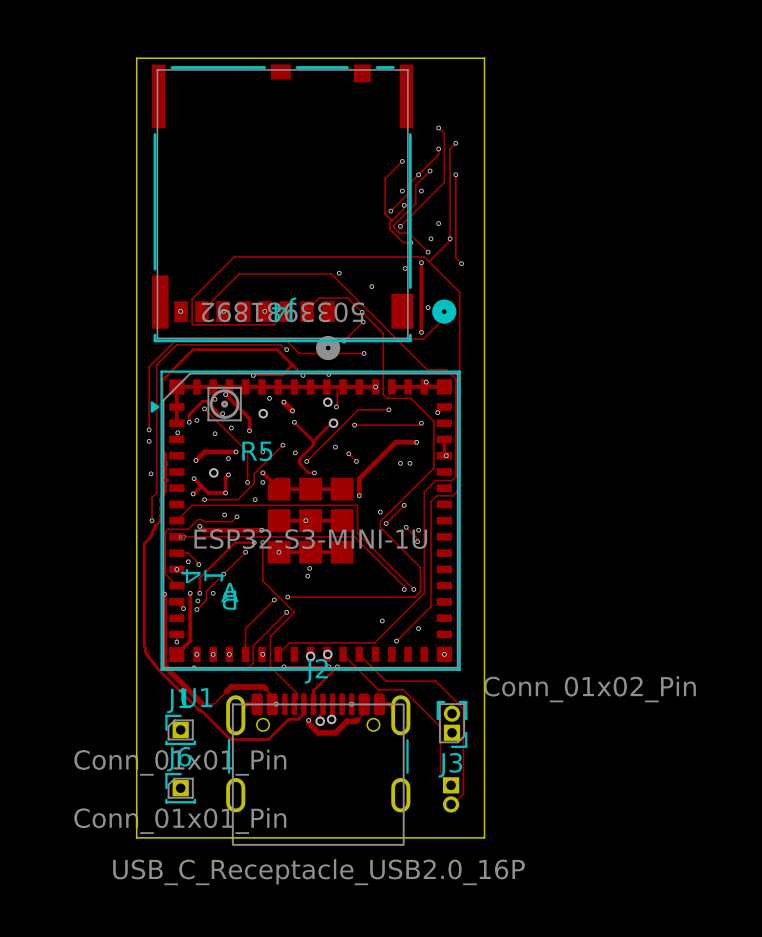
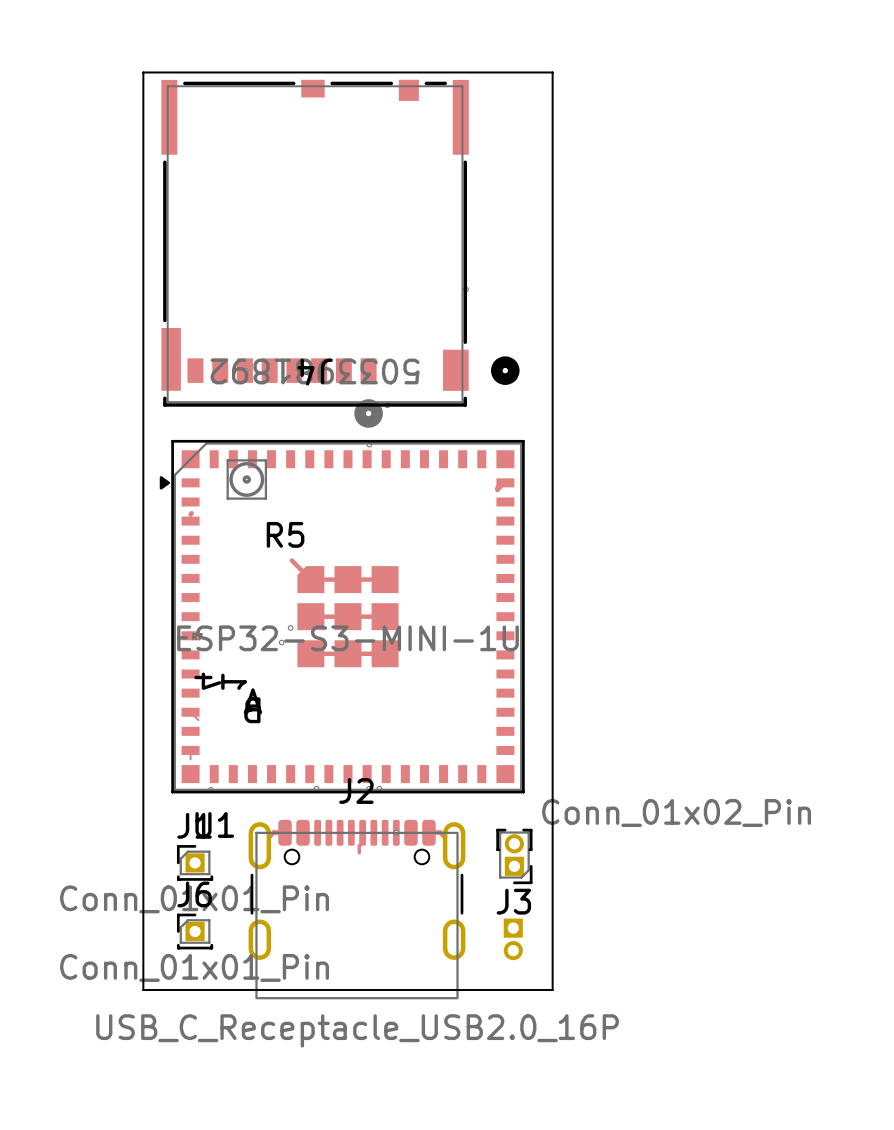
track: (438, 127) (444, 133) (444, 182) (400, 226) -> none
via: (438, 127) -> none
track: (455, 143) (450, 149) (450, 240) (429, 261) -> none
via: (455, 143) -> none
track: (438, 149) (438, 154) (408, 185) (408, 193) (390, 211) -> none
via: (438, 149) -> none
track: (402, 161) (385, 178) (385, 213) (391, 220) -> none
via: (402, 161) -> none
track: (430, 170) (415, 185) (415, 203) (393, 225) (399, 233) (409, 233) (428, 252) -> none
via: (430, 170) -> none
via: (418, 174) -> none
track: (455, 174) (455, 257) (461, 263) -> none
via: (455, 174) -> none
via: (402, 191) -> none
via: (421, 191) -> none
track: (404, 205) (404, 208) (389, 222) (389, 229) (403, 242) (410, 242) -> none
via: (404, 205) -> none
via: (390, 211) -> none
via: (438, 223) -> none
via: (400, 226) -> none
via: (431, 238) -> none
via: (450, 238) -> none
via: (428, 252) -> none
track: (421, 262) (421, 332) -> none
via: (421, 262) -> none
via: (461, 263) -> none
via: (405, 268) -> none
via: (339, 273) -> none
via: (371, 286) -> none
via: (428, 307) -> none
track: (451, 307) (451, 311) (423, 339) (396, 339) -> none
via: (180, 311) -> none
track: (201, 311) (238, 274) (331, 274) (427, 369) (446, 369) (455, 379) (455, 476) (452, 480) (435, 480) (424, 492) (424, 593) (374, 642) (289, 642) (278, 654) -> none
via: (264, 311) -> none
track: (285, 311) (274, 324) (192, 323) (192, 299) (234, 256) (424, 256) (459, 292) (459, 489) (452, 495) (436, 495) (431, 501) (431, 606) (396, 641) -> none
track: (306, 311) (319, 298) (347, 298) (383, 333) (383, 394) (387, 398) (410, 398) (433, 421) (433, 468) (380, 521) (380, 527) (420, 567) (420, 591) (414, 597) (287, 597) -> none
via: (362, 312) -> none
track: (363, 321) (344, 341) -> none
via: (363, 321) -> none
via: (421, 332) -> none
track: (285, 349) (281, 344) (176, 344) (156, 364) (156, 492) (152, 497) (152, 520) -> none
via: (286, 349) -> none
track: (364, 353) (299, 353) (284, 339) (176, 339) (149, 366) (149, 429) -> none
via: (364, 353) -> none
track: (292, 364) (282, 374) (253, 375) -> none
via: (253, 375) -> none
track: (302, 375) (277, 349) (193, 349) (162, 380) (162, 450) (165, 453) (164, 476) (167, 480) (164, 483) (164, 493) (160, 498) (160, 520) (154, 526) (151, 536) (144, 543) (144, 646) (147, 655) (157, 668) (231, 739) (268, 739) (288, 719) (298, 719) (303, 713) (303, 704) -> none
via: (302, 375) -> none
via: (426, 382) -> none
track: (337, 386) (336, 406) -> none
track: (375, 386) (176, 386) (176, 423) -> none
via: (375, 386) -> none
track: (391, 386) (424, 386) (426, 382) (431, 386) (444, 386) -> none
track: (225, 394) (249, 418) (249, 430) -> none
via: (225, 394) -> none
via: (269, 398) -> none
via: (215, 399) -> none
track: (283, 402) (292, 410) -> none
via: (283, 402) -> none
via: (327, 402) -> none
via: (336, 406) -> none
track: (204, 408) (247, 451) (247, 482) -> none
via: (204, 408) -> none
track: (388, 409) (358, 409) (306, 461) -> none
via: (388, 409) -> none
via: (292, 410) -> none
via: (437, 412) -> none
track: (222, 413) (218, 413) (206, 401) (202, 401) (189, 414) (189, 422) -> none
via: (222, 413) -> none
via: (263, 413) -> none
via: (196, 420) -> none
via: (189, 422) -> none
track: (294, 422) (313, 441) -> none
via: (294, 422) -> none
track: (331, 423) (313, 441) -> none
via: (333, 423) -> none
track: (421, 423) (419, 425) (354, 425) -> none
via: (421, 423) -> none
via: (354, 425) -> none
via: (231, 428) -> none
via: (149, 429) -> none
via: (249, 430) -> none
via: (177, 432) -> none
via: (215, 433) -> none
track: (444, 439) (444, 453) (446, 455) -> none
via: (149, 441) -> none
track: (313, 441) (313, 445) (300, 458) (299, 462) (308, 472) (314, 472) -> none
track: (416, 442) (395, 442) (359, 478) (359, 495) -> none
via: (416, 442) -> none
track: (282, 445) (254, 473) (254, 483) (238, 499) (204, 499) -> none
via: (282, 445) -> none
via: (335, 447) -> none
track: (236, 451) (204, 451) (195, 460) -> none
via: (236, 451) -> none
via: (262, 451) -> none
via: (295, 452) -> none
track: (348, 453) (356, 461) -> none
via: (348, 453) -> none
via: (446, 455) -> none
via: (228, 458) -> none
via: (195, 460) -> none
via: (306, 461) -> none
via: (356, 461) -> none
via: (400, 463) -> none
via: (409, 463) -> none
via: (213, 472) -> none
via: (262, 472) -> none
via: (314, 472) -> none
via: (151, 473) -> none
track: (228, 474) (225, 477) (225, 492) (208, 492) (194, 478) -> none
via: (228, 474) -> none
via: (194, 478) -> none
via: (247, 482) -> none
via: (262, 482) -> none
track: (201, 486) (193, 493) -> none
via: (225, 492) -> none
via: (193, 493) -> none
via: (359, 495) -> none
via: (204, 499) -> none
via: (255, 499) -> none
track: (404, 505) (386, 523) -> none
via: (404, 505) -> none
via: (380, 512) -> none
via: (224, 514) -> none
track: (237, 516) (232, 521) (203, 521) (197, 519) (188, 529) (168, 529) (165, 532) (165, 574) (176, 585) -> none
via: (237, 516) -> none
via: (152, 520) -> none
track: (176, 520) (192, 505) (357, 505) (357, 533) (413, 589) -> none
via: (305, 520) -> none
via: (386, 523) -> none
track: (199, 526) (203, 530) (261, 530) -> none
via: (199, 526) -> none
track: (406, 527) (417, 538) (417, 541) -> none
via: (406, 527) -> none
via: (418, 530) -> none
track: (176, 536) (354, 536) (404, 586) (404, 589) -> none
via: (417, 541) -> none
track: (254, 542) (235, 542) (199, 578) (199, 593) -> none
track: (262, 542) (262, 580) (294, 612) (270, 636) (270, 666) (297, 693) (297, 698) -> none
via: (262, 542) -> none
track: (245, 552) (206, 591) (206, 599) (196, 609) -> none
via: (245, 552) -> none
via: (279, 552) -> none
track: (176, 553) (188, 553) (198, 563) -> none
via: (188, 561) -> none
via: (198, 564) -> none
via: (309, 568) -> none
via: (176, 569) -> none
via: (223, 574) -> none
via: (307, 576) -> none
via: (404, 589) -> none
via: (413, 589) -> none
track: (190, 593) (190, 641) (176, 654) -> none
via: (190, 593) -> none
via: (199, 593) -> none
via: (213, 593) -> none
track: (164, 594) (164, 665) (202, 704) (214, 704) (231, 686) (263, 686) (272, 695) (272, 704) (276, 704) -> none
via: (164, 594) -> none
via: (287, 597) -> none
track: (274, 599) (245, 628) (245, 654) -> none
via: (274, 599) -> none
via: (197, 600) -> none
via: (183, 608) -> none
via: (196, 609) -> none
track: (286, 612) (253, 645) (253, 663) (248, 667) (194, 667) -> none
via: (286, 612) -> none
via: (382, 620) -> none
via: (418, 628) -> none
via: (396, 641) -> none
via: (176, 642) -> none
via: (196, 654) -> none
via: (213, 654) -> none
via: (229, 654) -> none
via: (262, 654) -> none
via: (327, 654) -> none
track: (343, 654) (378, 689) (403, 689) (440, 727) (440, 774) (451, 785) -> none
track: (359, 654) (386, 681) (435, 681) (463, 708) (463, 793) (452, 804) -> none
via: (444, 654) -> none
via: (310, 656) -> none
track: (283, 666) (328, 666) -> none
track: (337, 666) (313, 690) (313, 704) -> none
via: (276, 704) -> none
track: (364, 704) (364, 713) (355, 721) (346, 721) (335, 732) (318, 732) (308, 723) (308, 720) -> none
via: (331, 719) -> none
via: (308, 720) -> none
via: (320, 721) -> none

